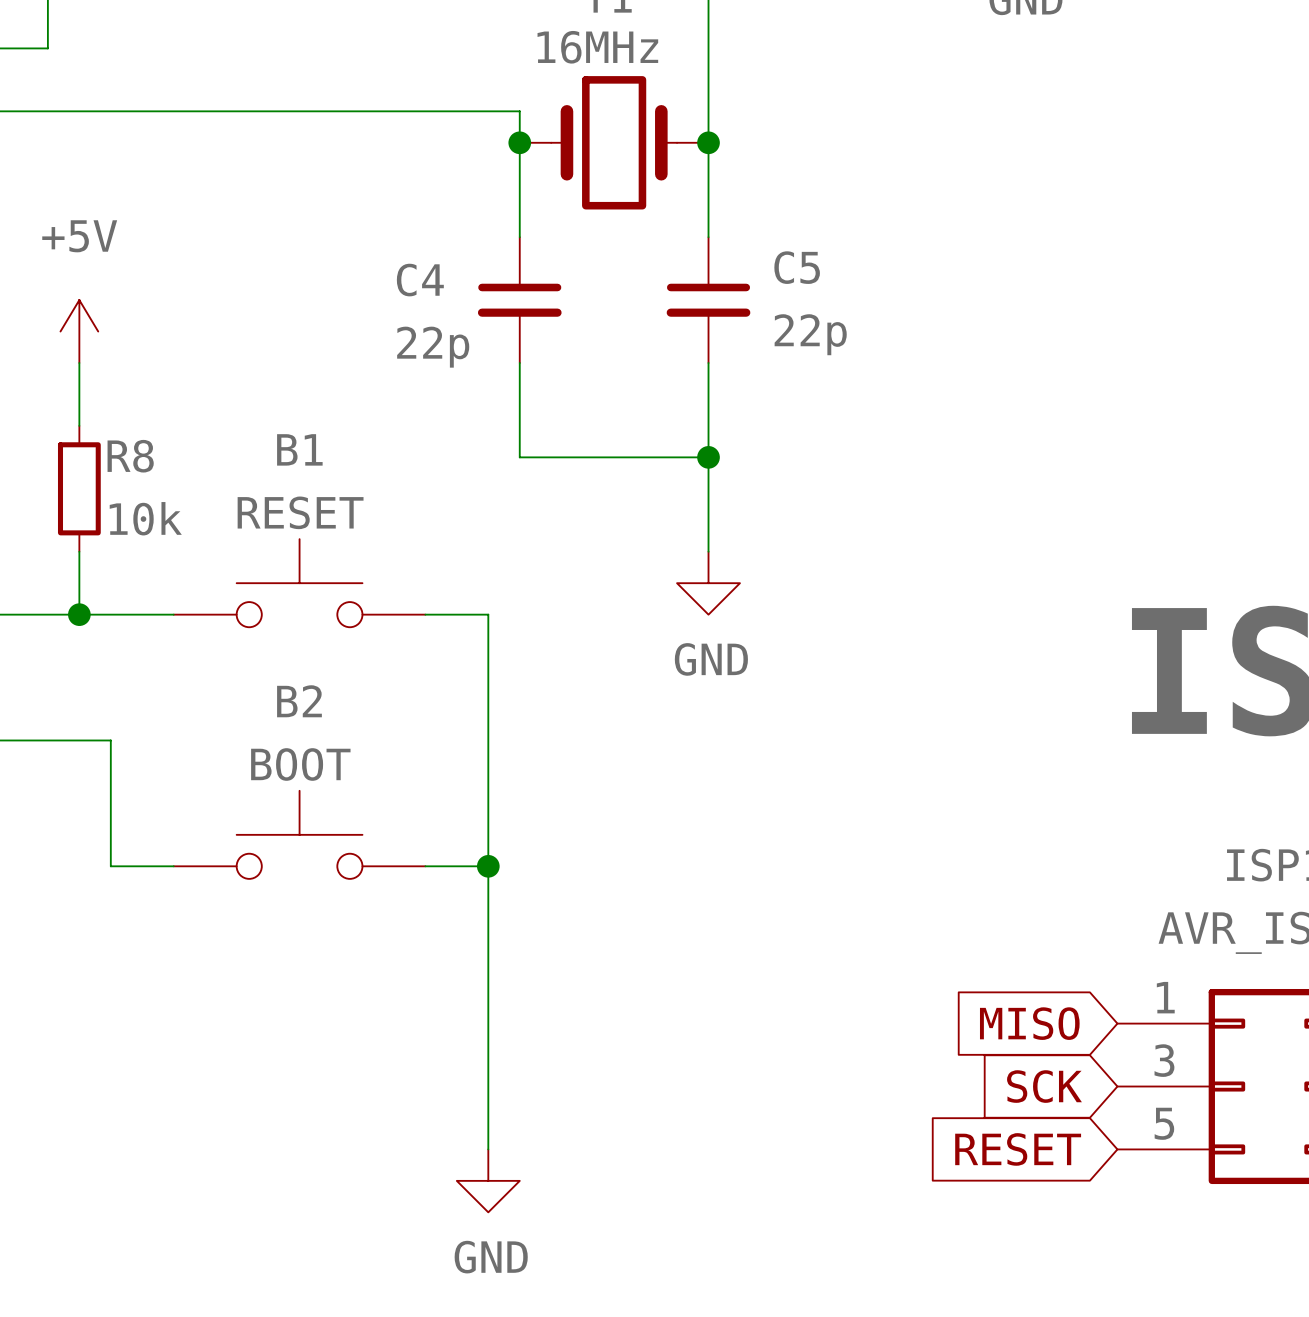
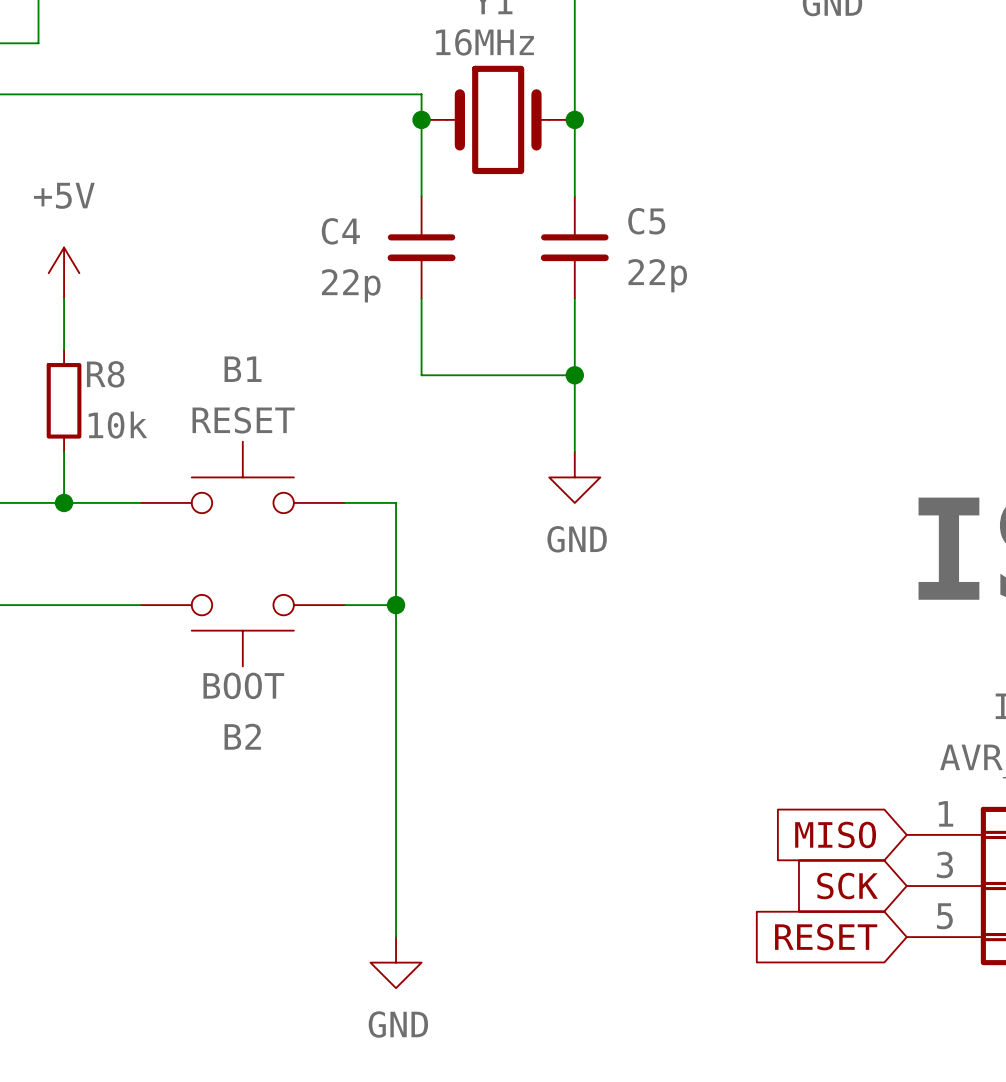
wire: (110, 740) (110, 866) (173, 866) -> (89, 605) (140, 605)
B2 rotation: 0° (299, 834) -> 180° (242, 630)
wire: (425, 866) (488, 866) -> (344, 605) (396, 605)
junction position: (488, 866) -> (396, 605)

